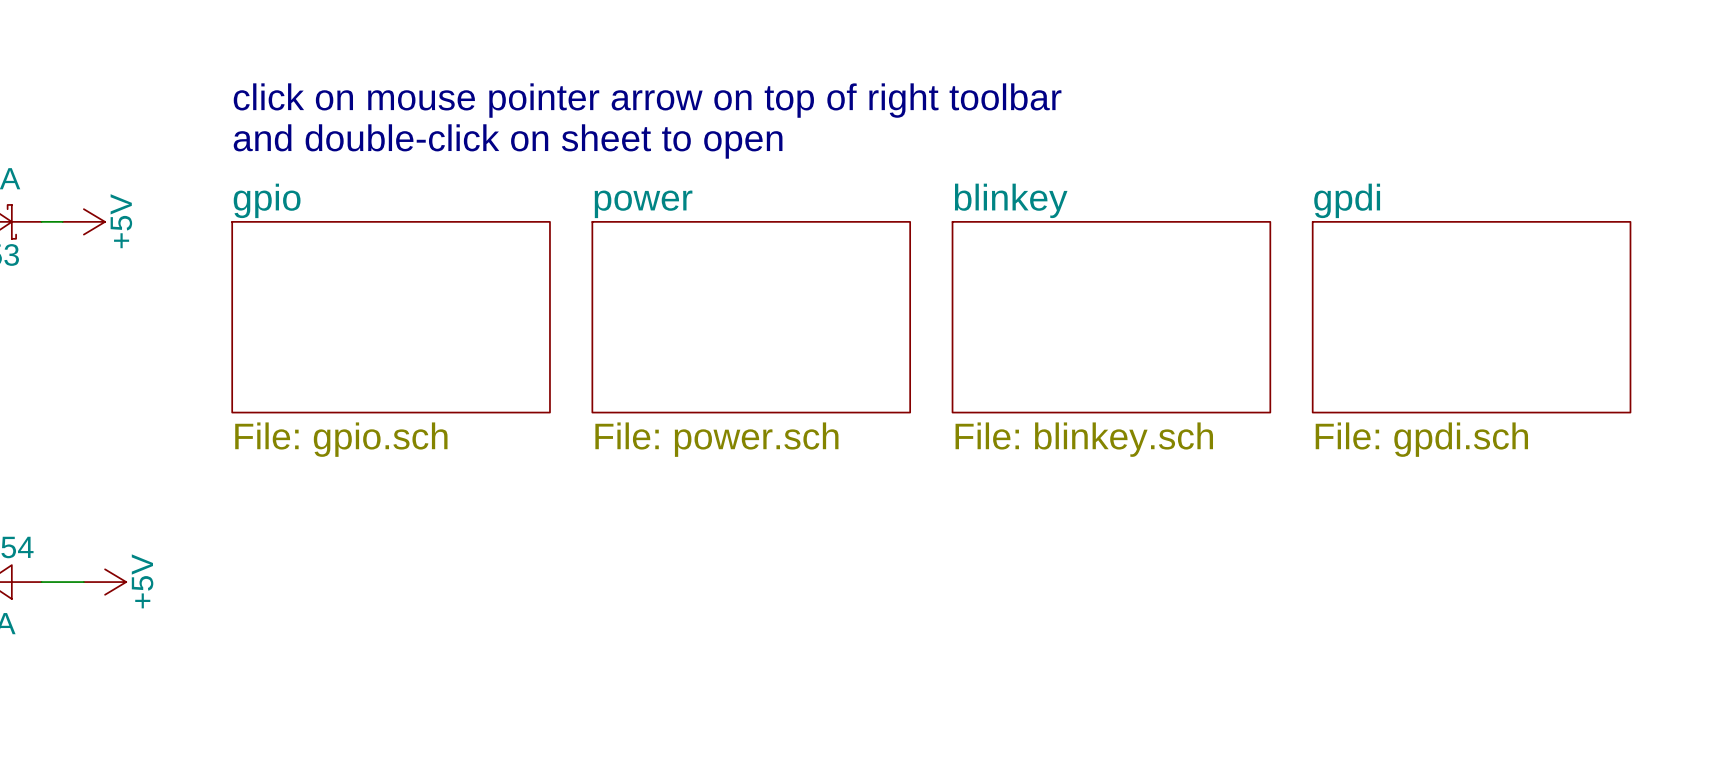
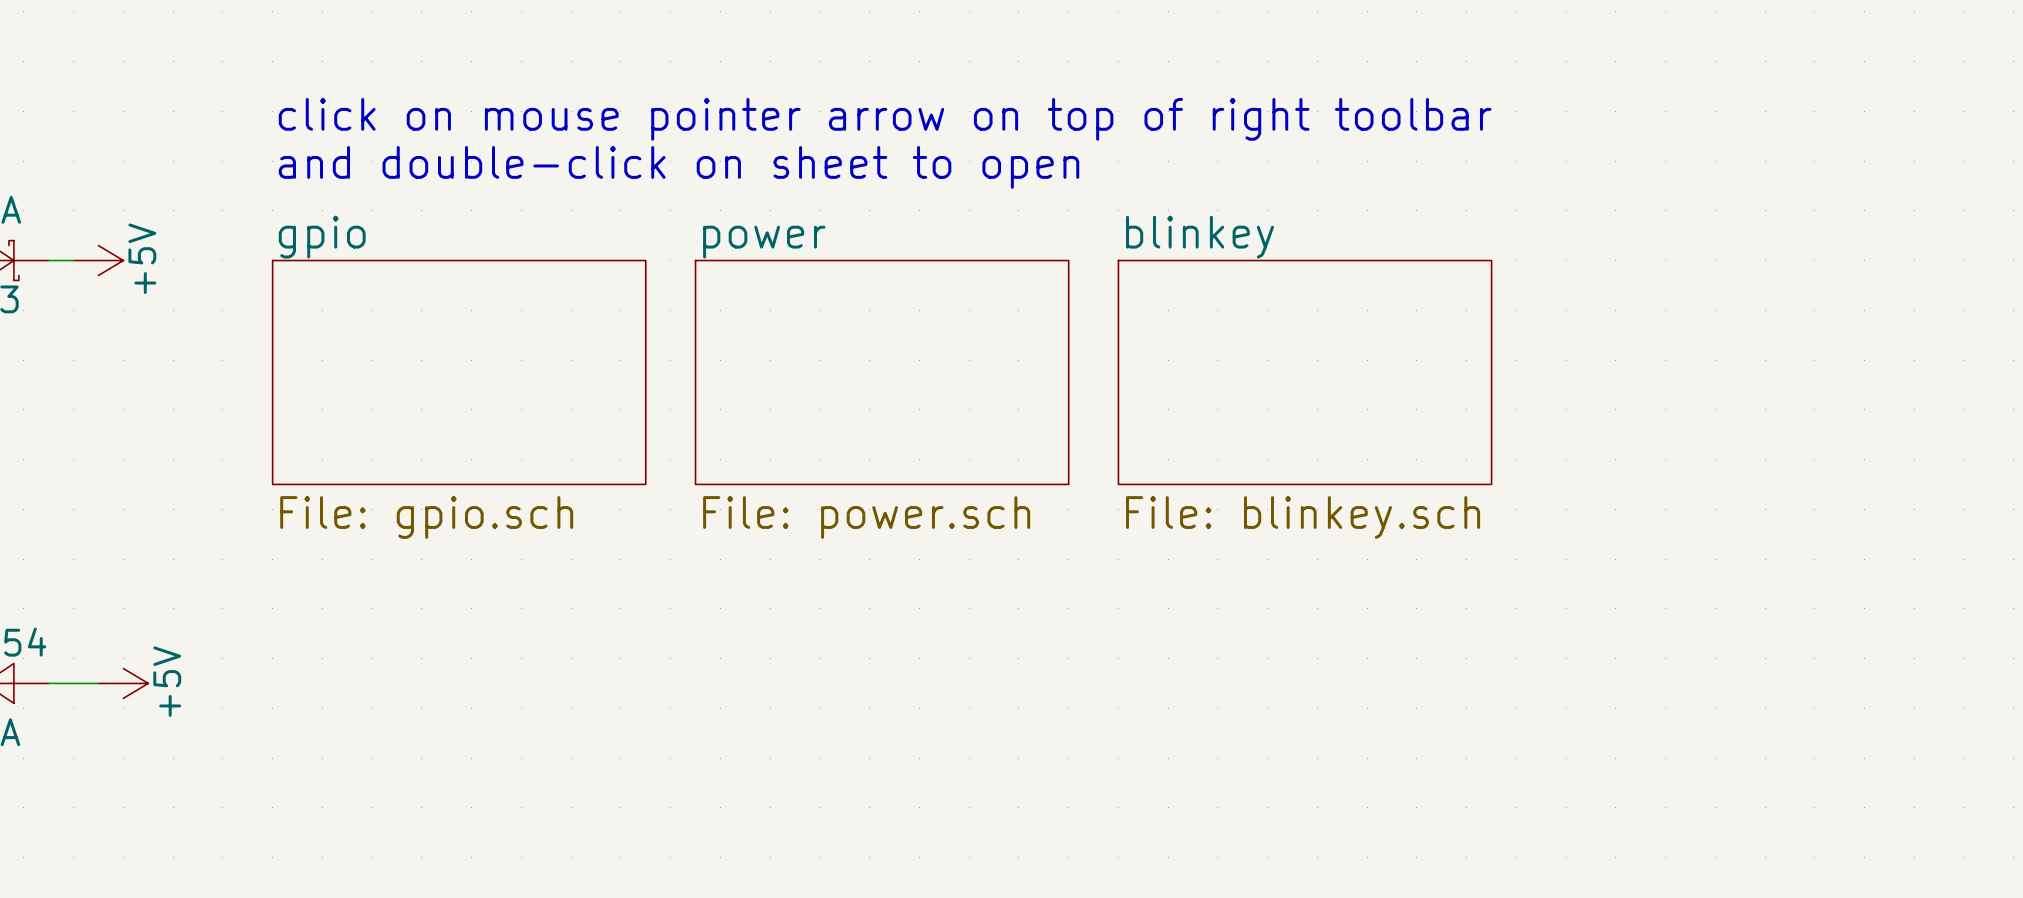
sheet gpdi: File: gpdi.sch (1471, 317) -> none

